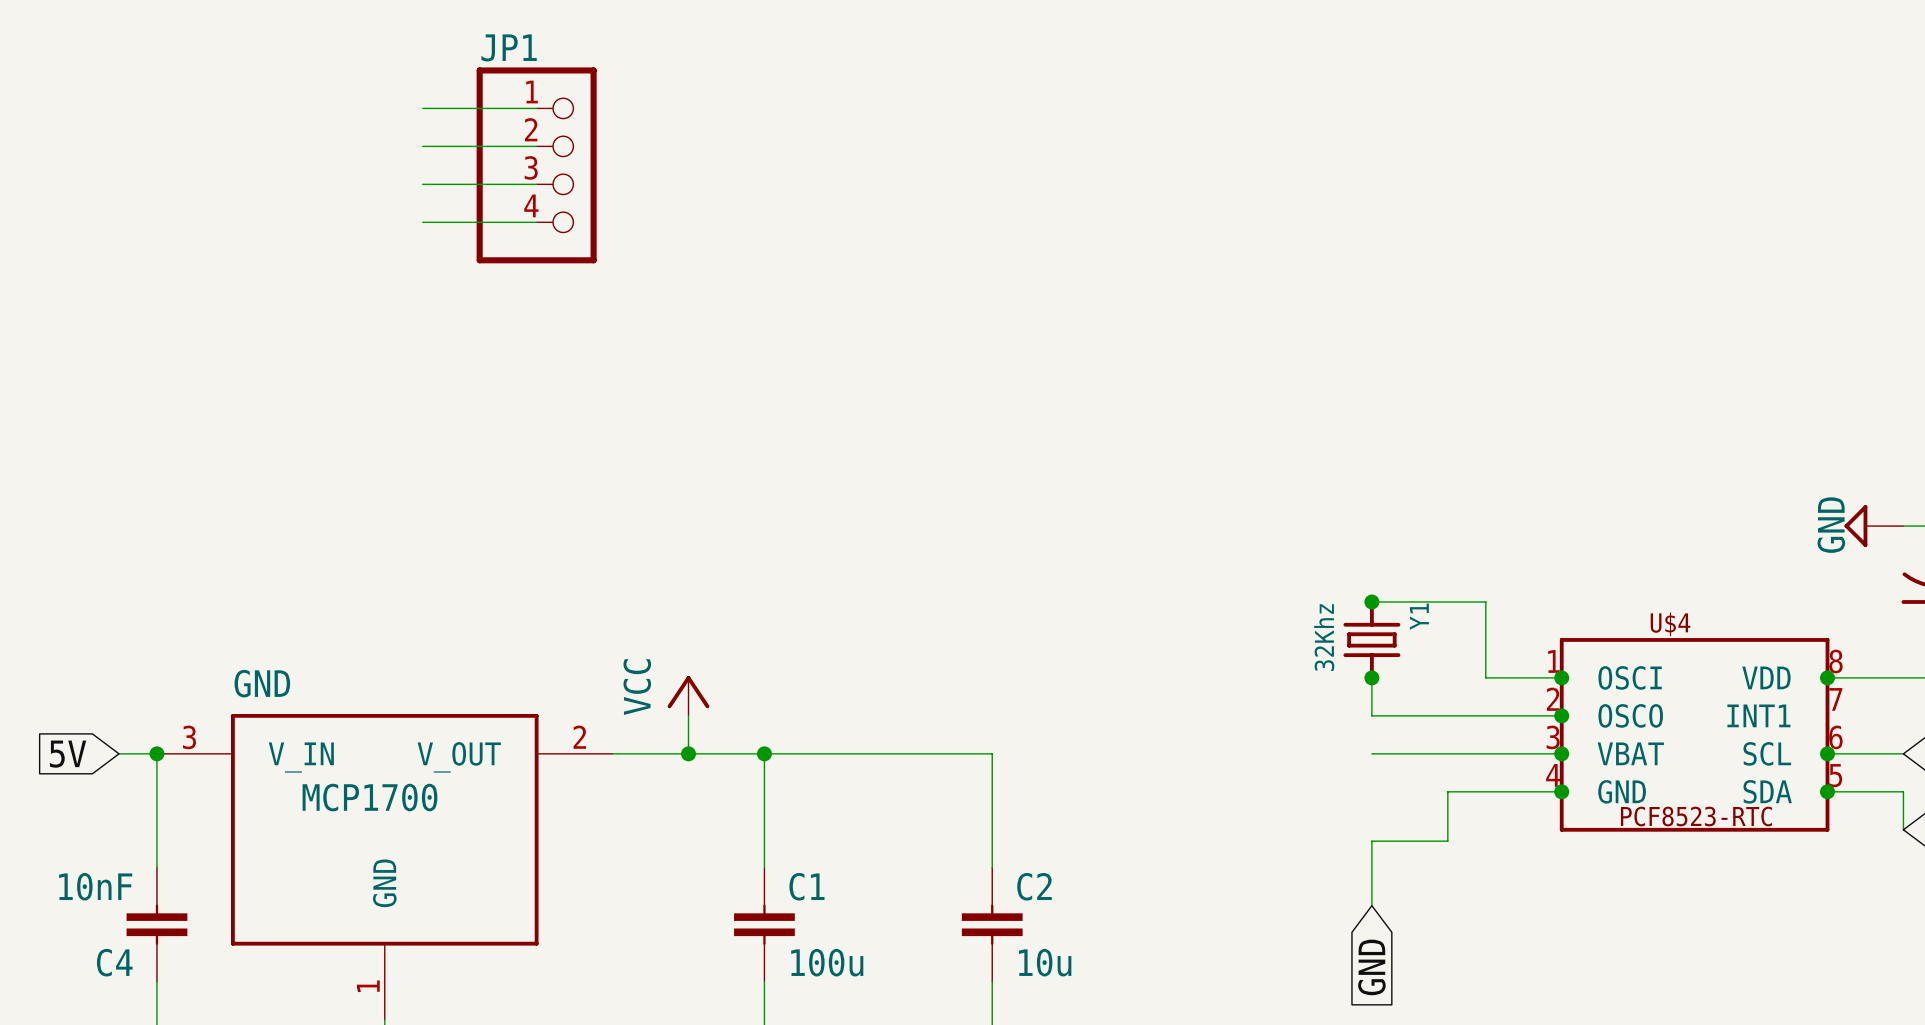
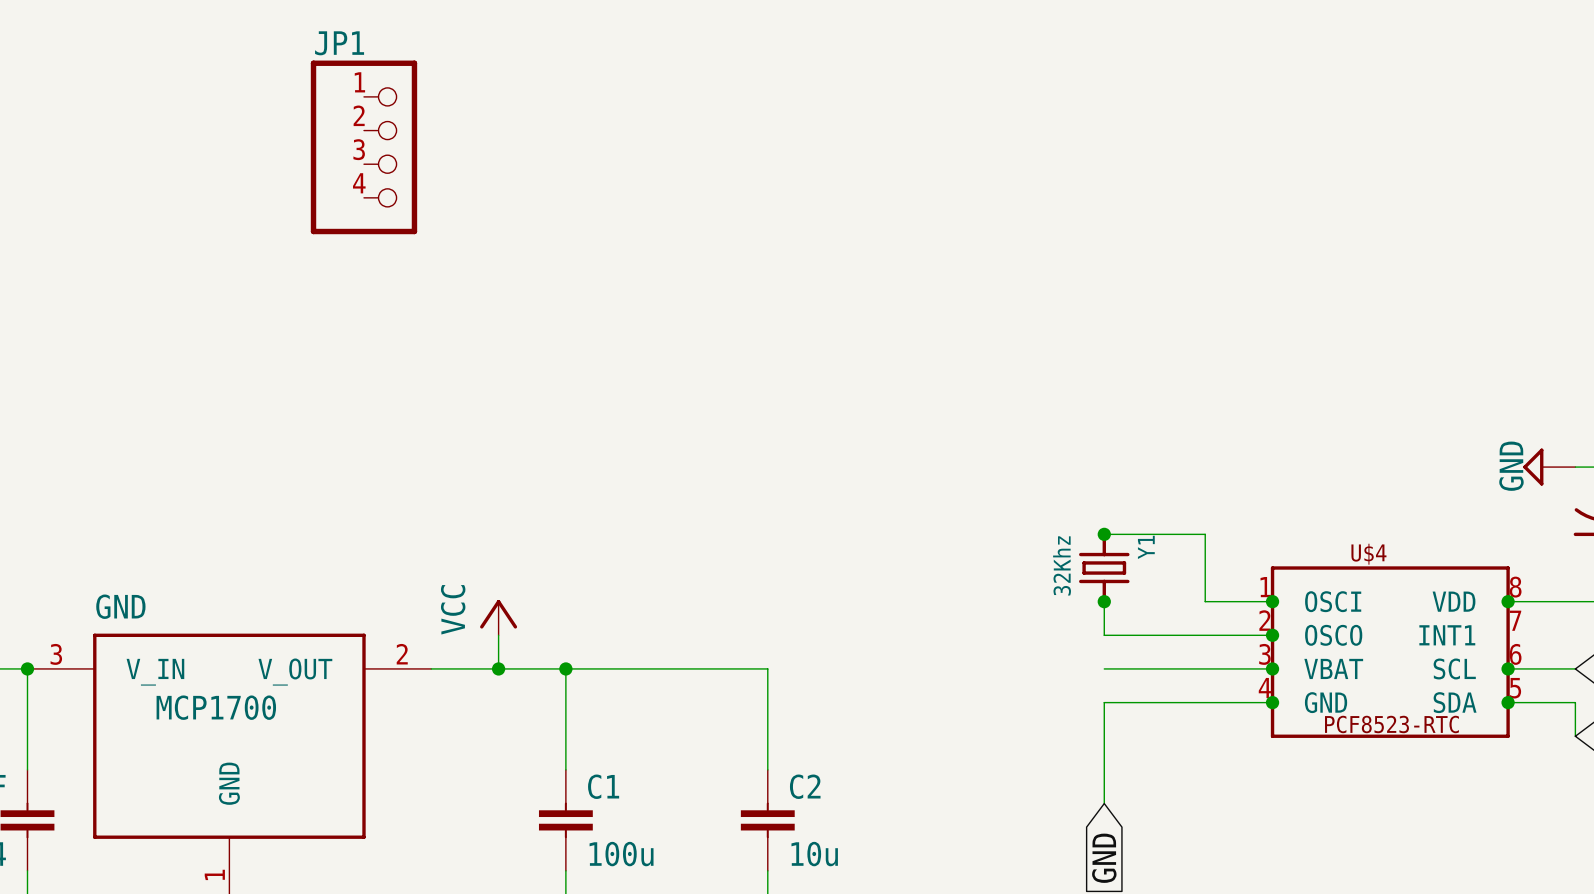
wire: (422, 108) (536, 108) -> none
wire: (422, 146) (536, 146) -> none
wire: (422, 184) (536, 184) -> none
wire: (422, 222) (536, 222) -> none
wire: (1447, 791) (1447, 841) (1371, 841) -> (1171, 702) (1104, 702) (1104, 746)

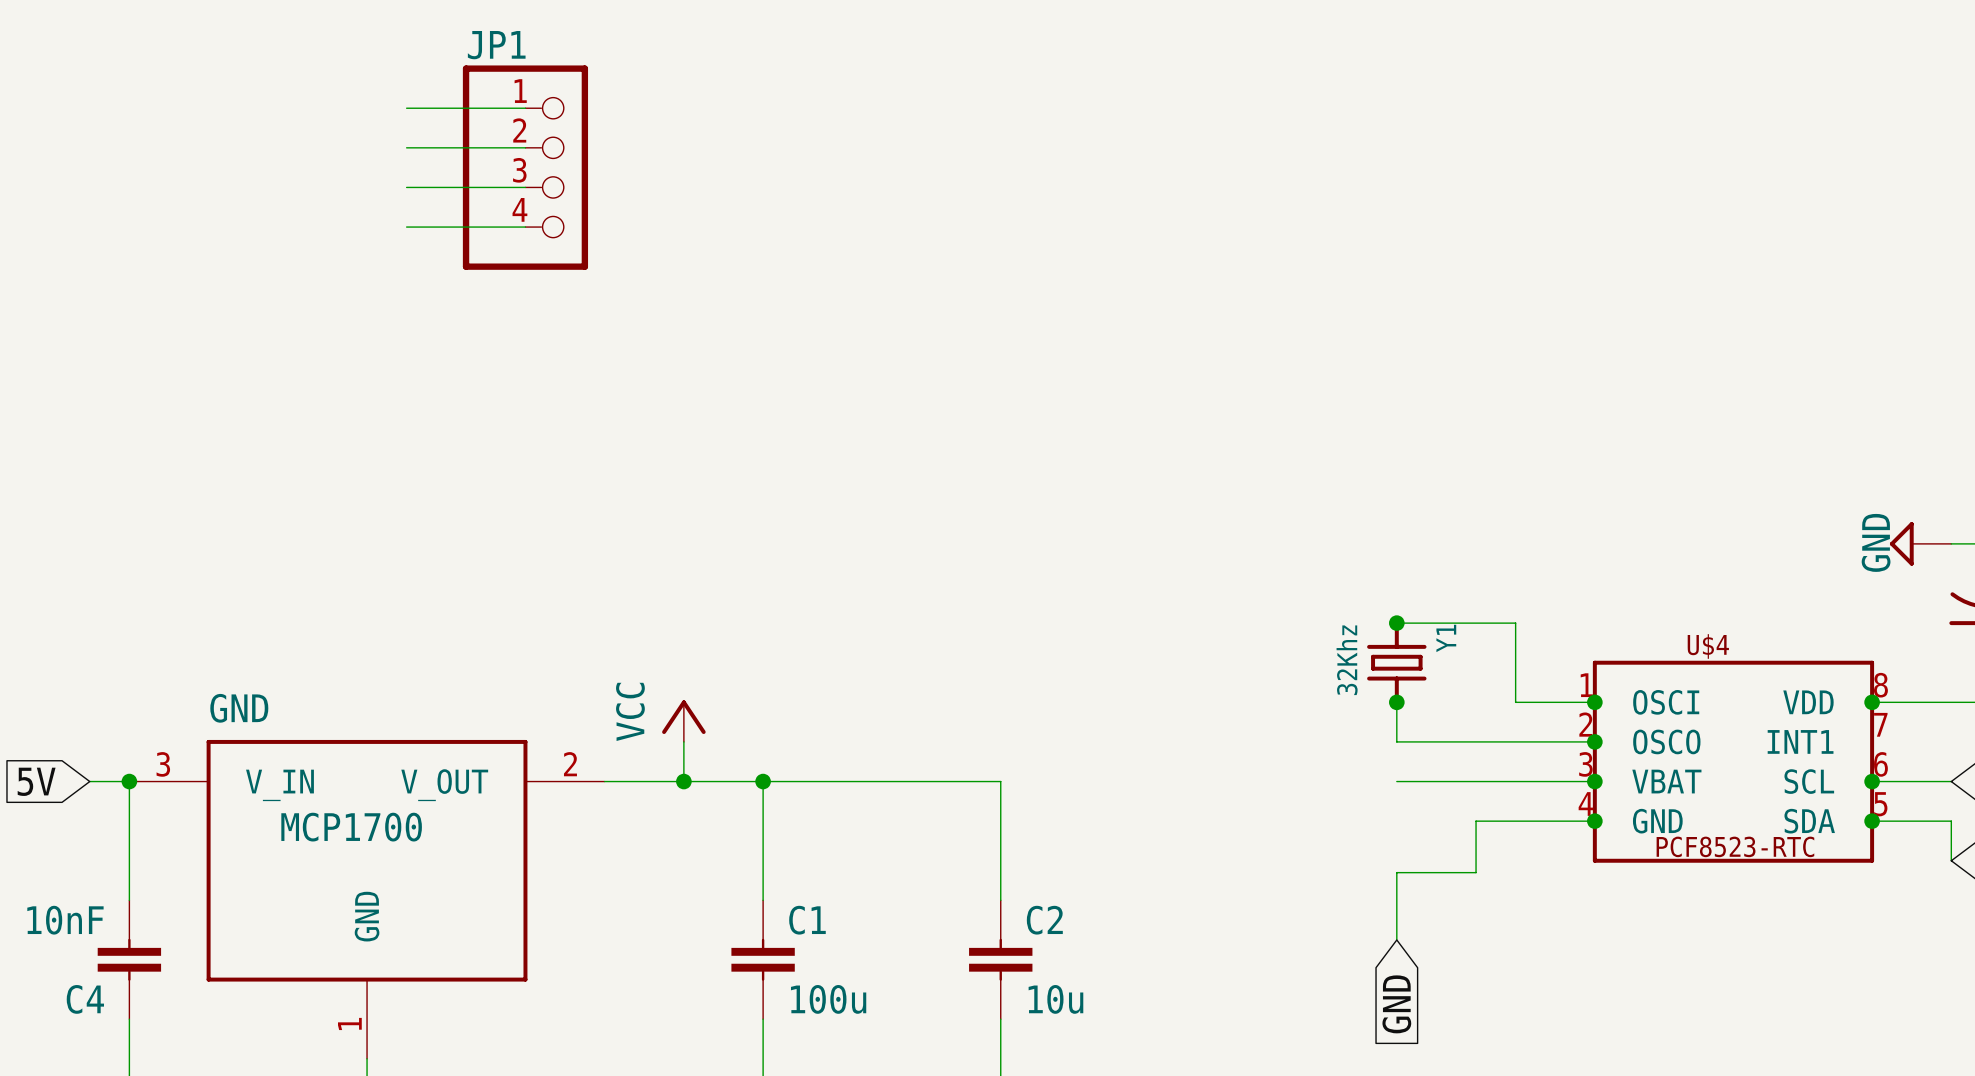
wire: none -> (406, 108) (525, 108)
wire: none -> (406, 147) (525, 147)
wire: none -> (406, 187) (525, 187)
wire: none -> (406, 227) (525, 227)
wire: (1171, 702) (1104, 702) (1104, 746) -> (1476, 821) (1476, 872) (1396, 872)

